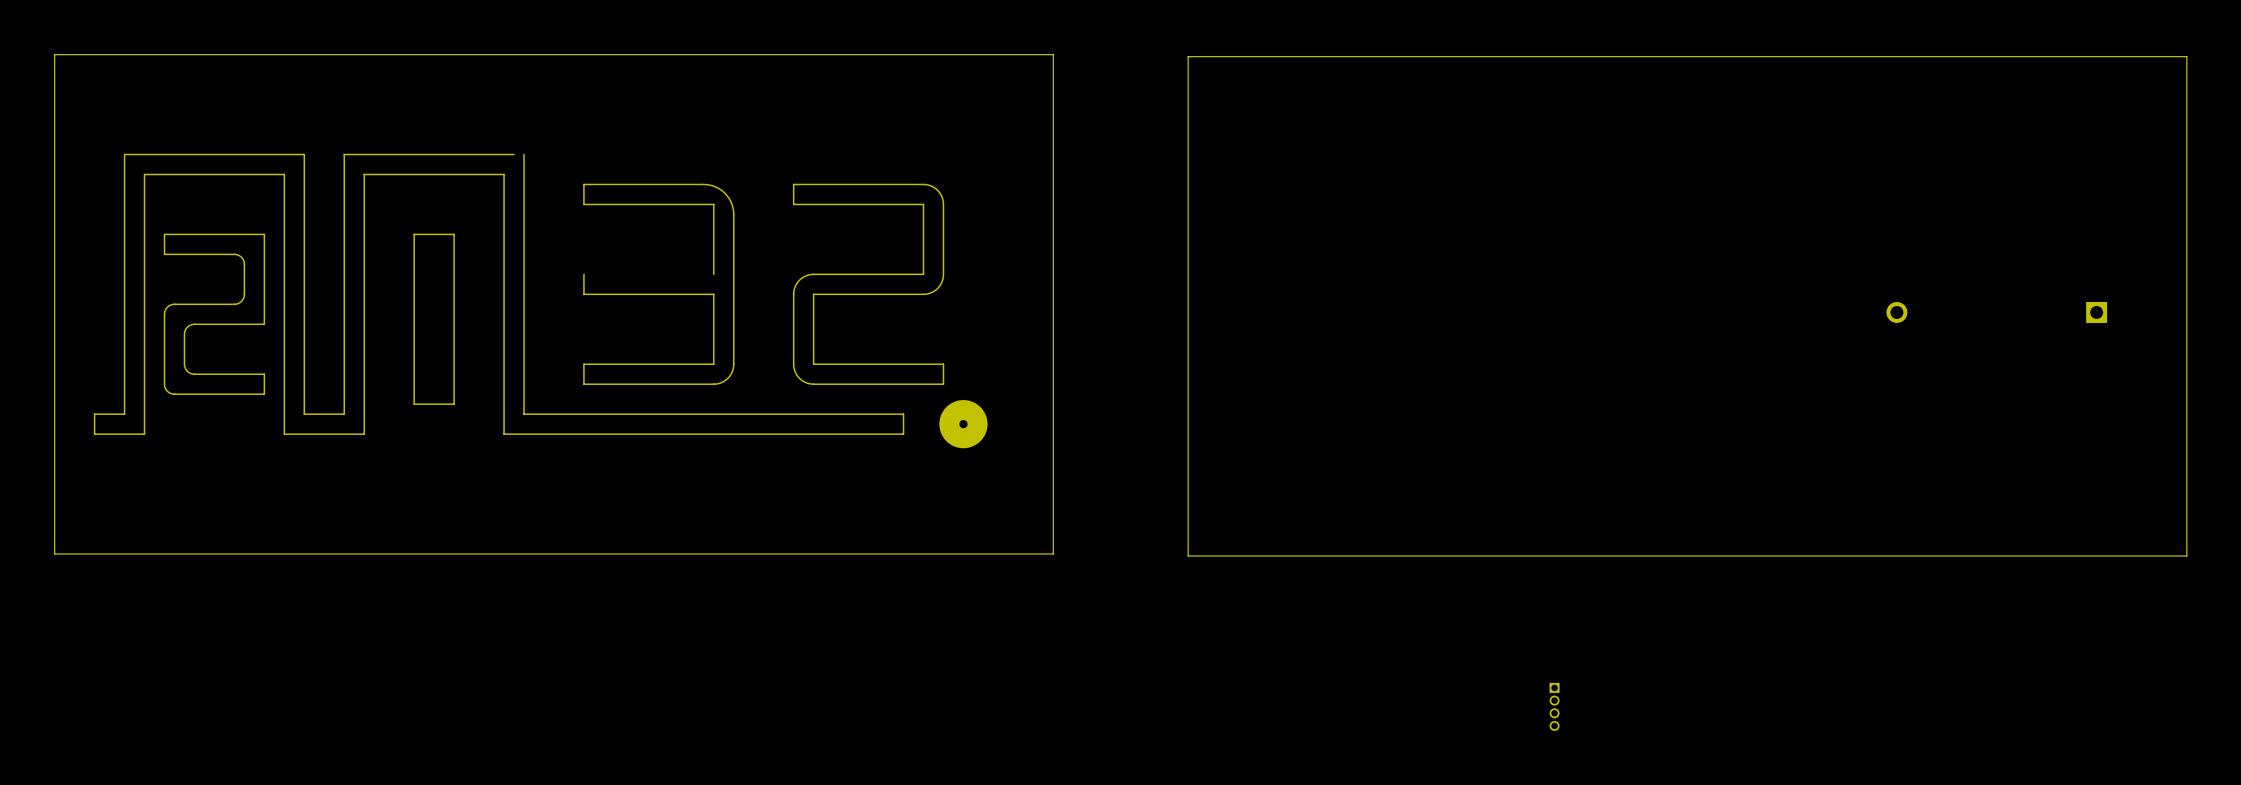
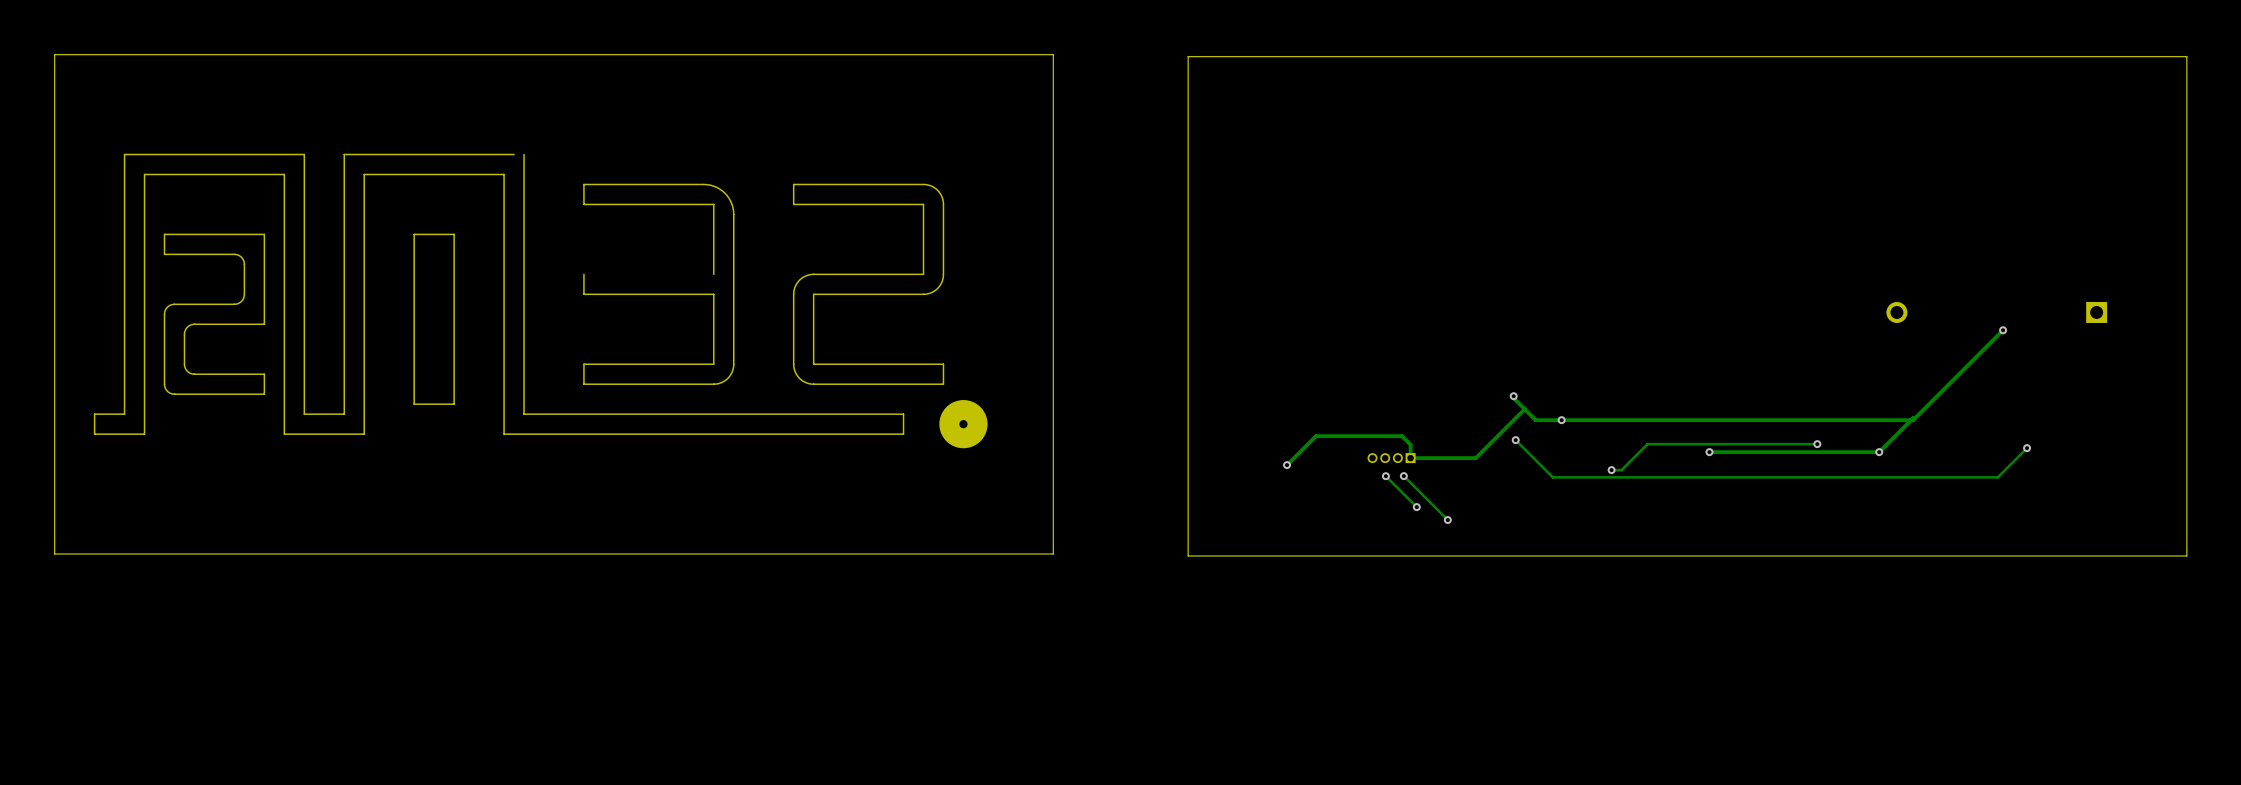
track: none -> (2003, 330) (1913, 420) (1535, 420) (1513, 396)
via: none -> (2003, 330)
via: none -> (1513, 396)
track: none -> (1524, 409) (1475, 458) (1410, 458) (1410, 444) (1401, 436) (1315, 436) (1287, 465)
track: none -> (1915, 418) (1879, 452) (1709, 452)
via: none -> (1561, 420)
track: none -> (1515, 440) (1552, 477) (1997, 477) (2027, 448)
via: none -> (1515, 440)
track: none -> (1817, 444) (1647, 444) (1621, 470) (1611, 470)
via: none -> (1817, 444)
via: none -> (2027, 448)
via: none -> (1709, 452)
via: none -> (1879, 452)
part: none -> (1391, 458)
via: none -> (1287, 465)
via: none -> (1611, 470)
track: none -> (1385, 476) (1416, 507)
via: none -> (1385, 476)
track: none -> (1403, 476) (1447, 520)
via: none -> (1403, 476)
via: none -> (1416, 507)
via: none -> (1447, 520)
part: (1554, 706) -> none

